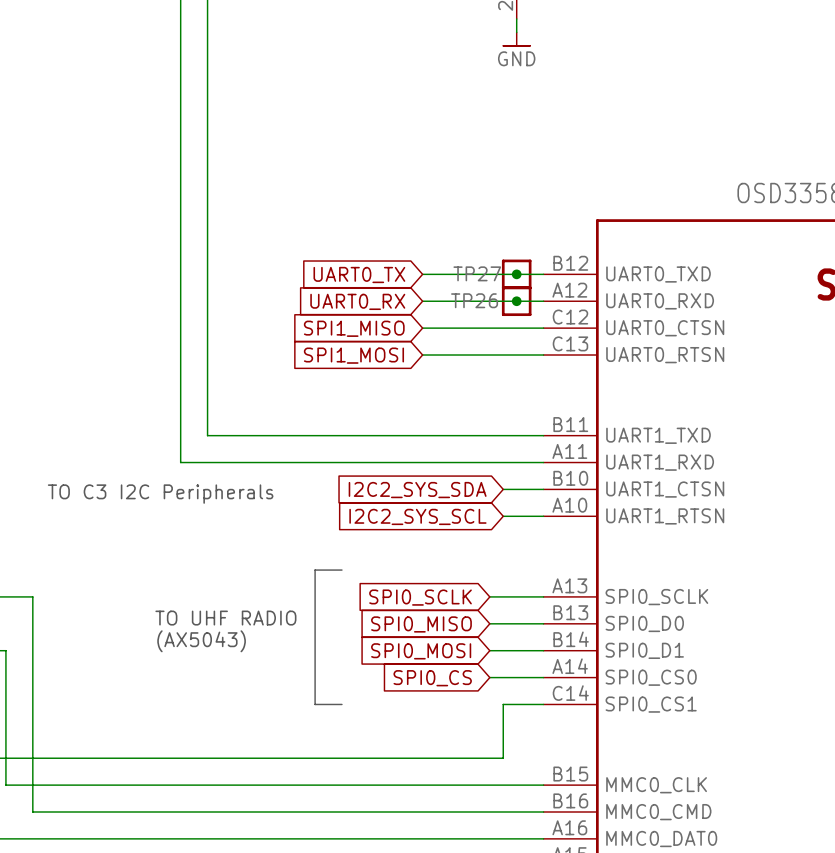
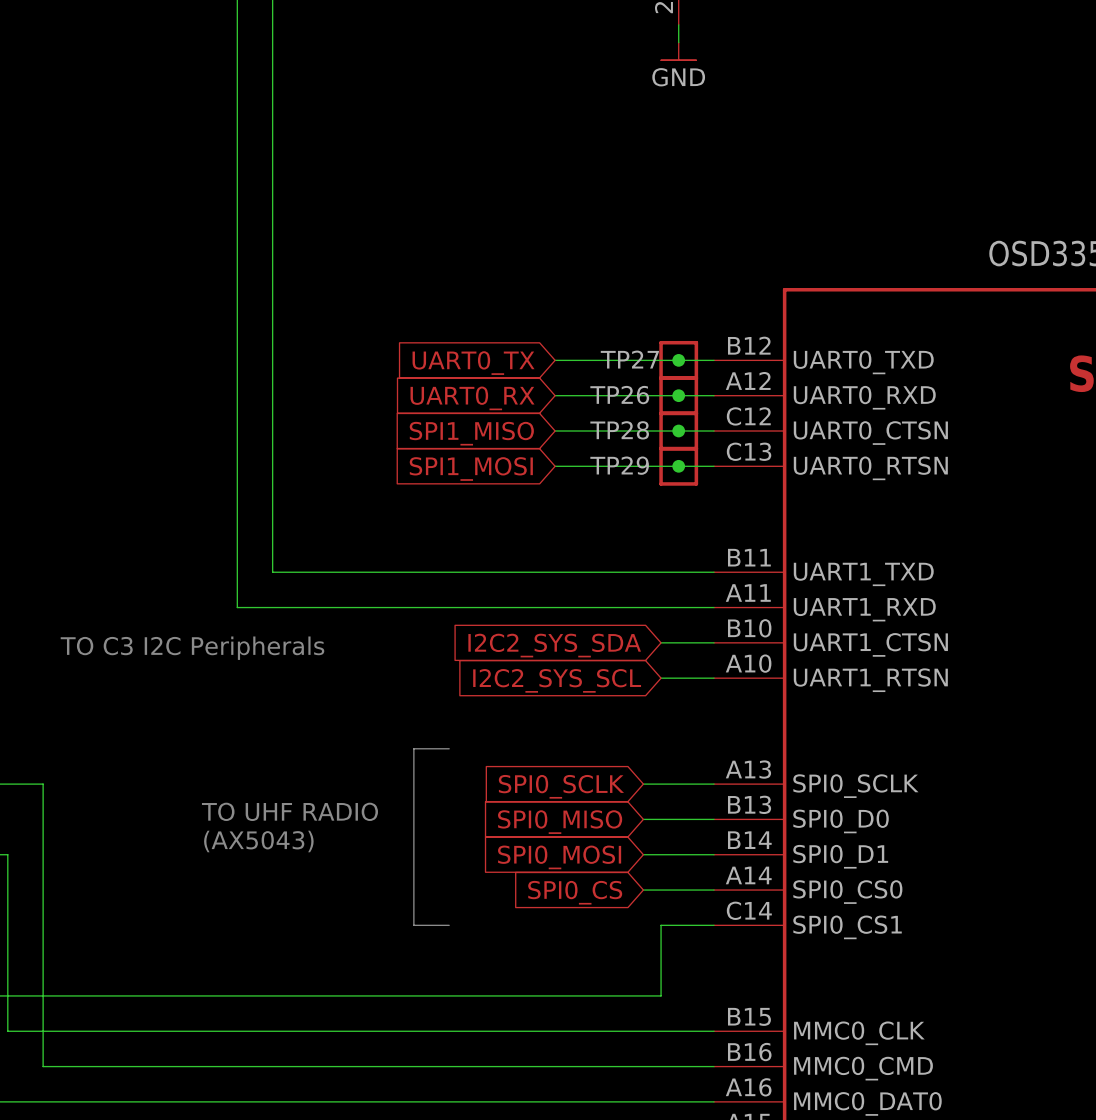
junction: none -> (678, 431)
TP28: none -> (678, 431)
junction: none -> (678, 466)
TP29: none -> (678, 466)

